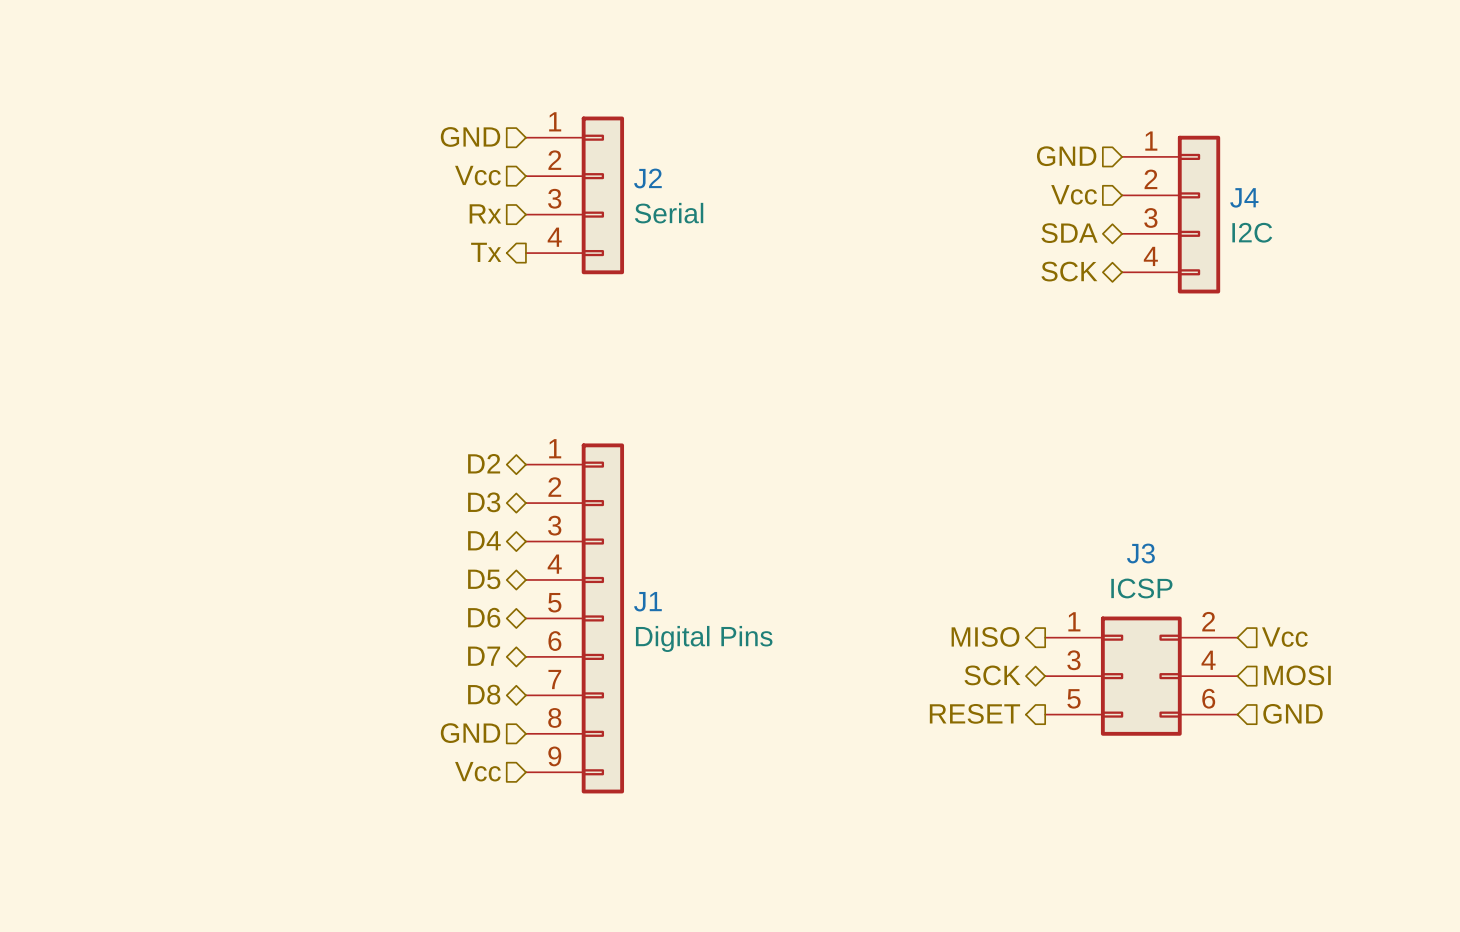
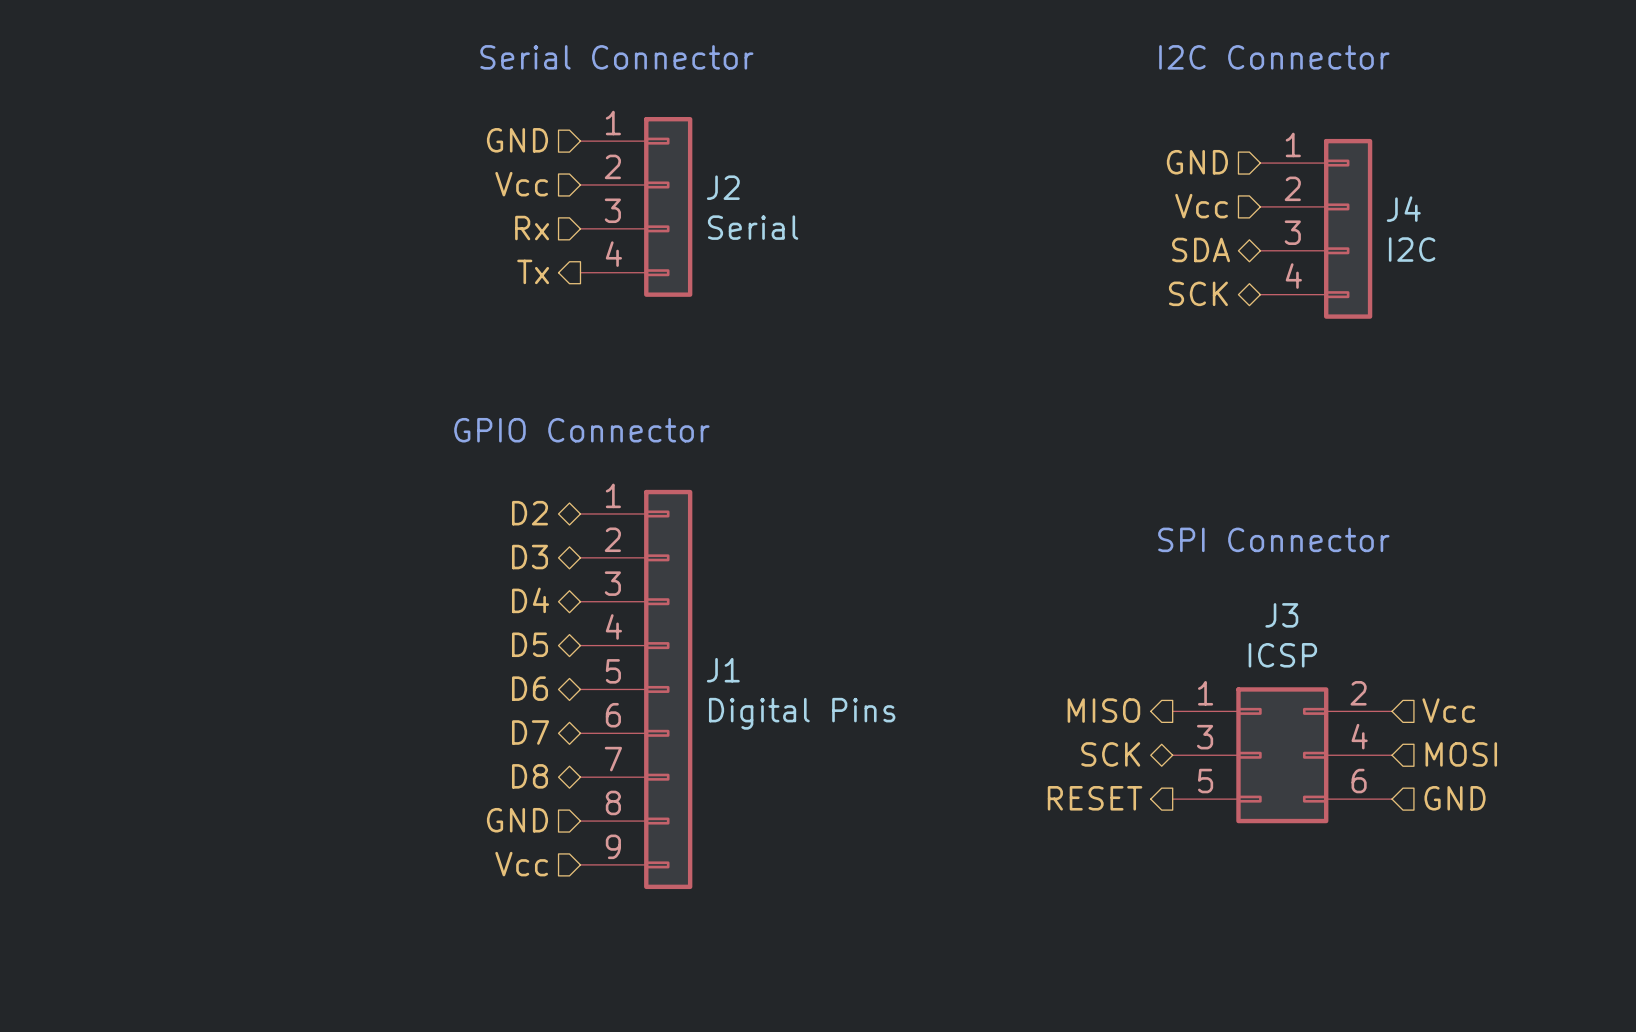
text: none -> Serial Connector (616, 57)
text: none -> I2C Connector (1274, 57)
text: none -> GPIO Connector (581, 430)
text: none -> SPI Connector (1273, 539)

